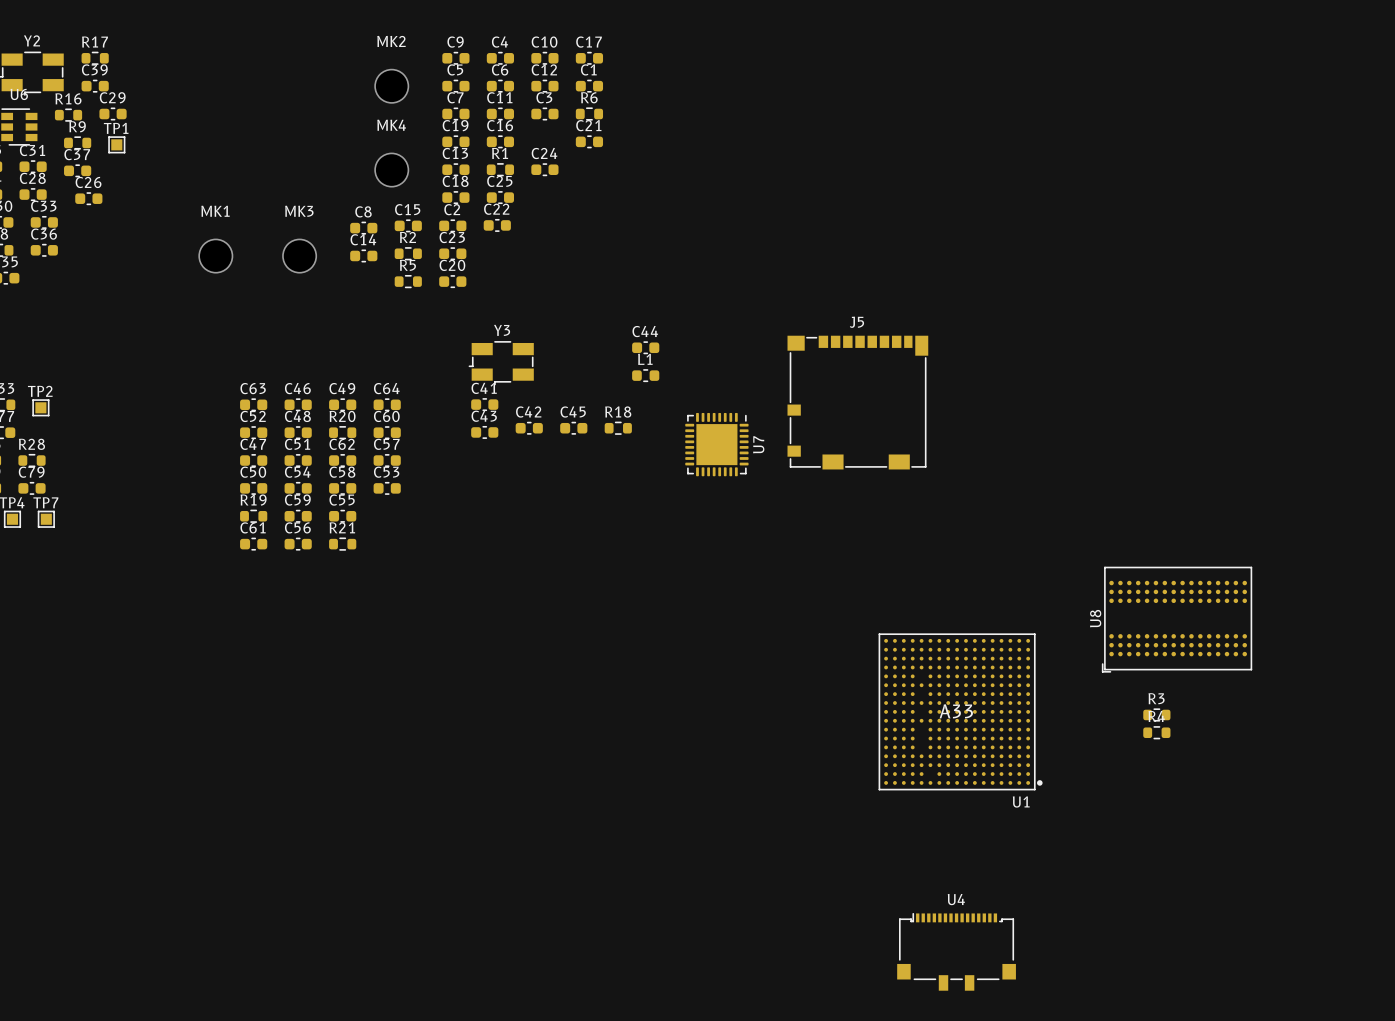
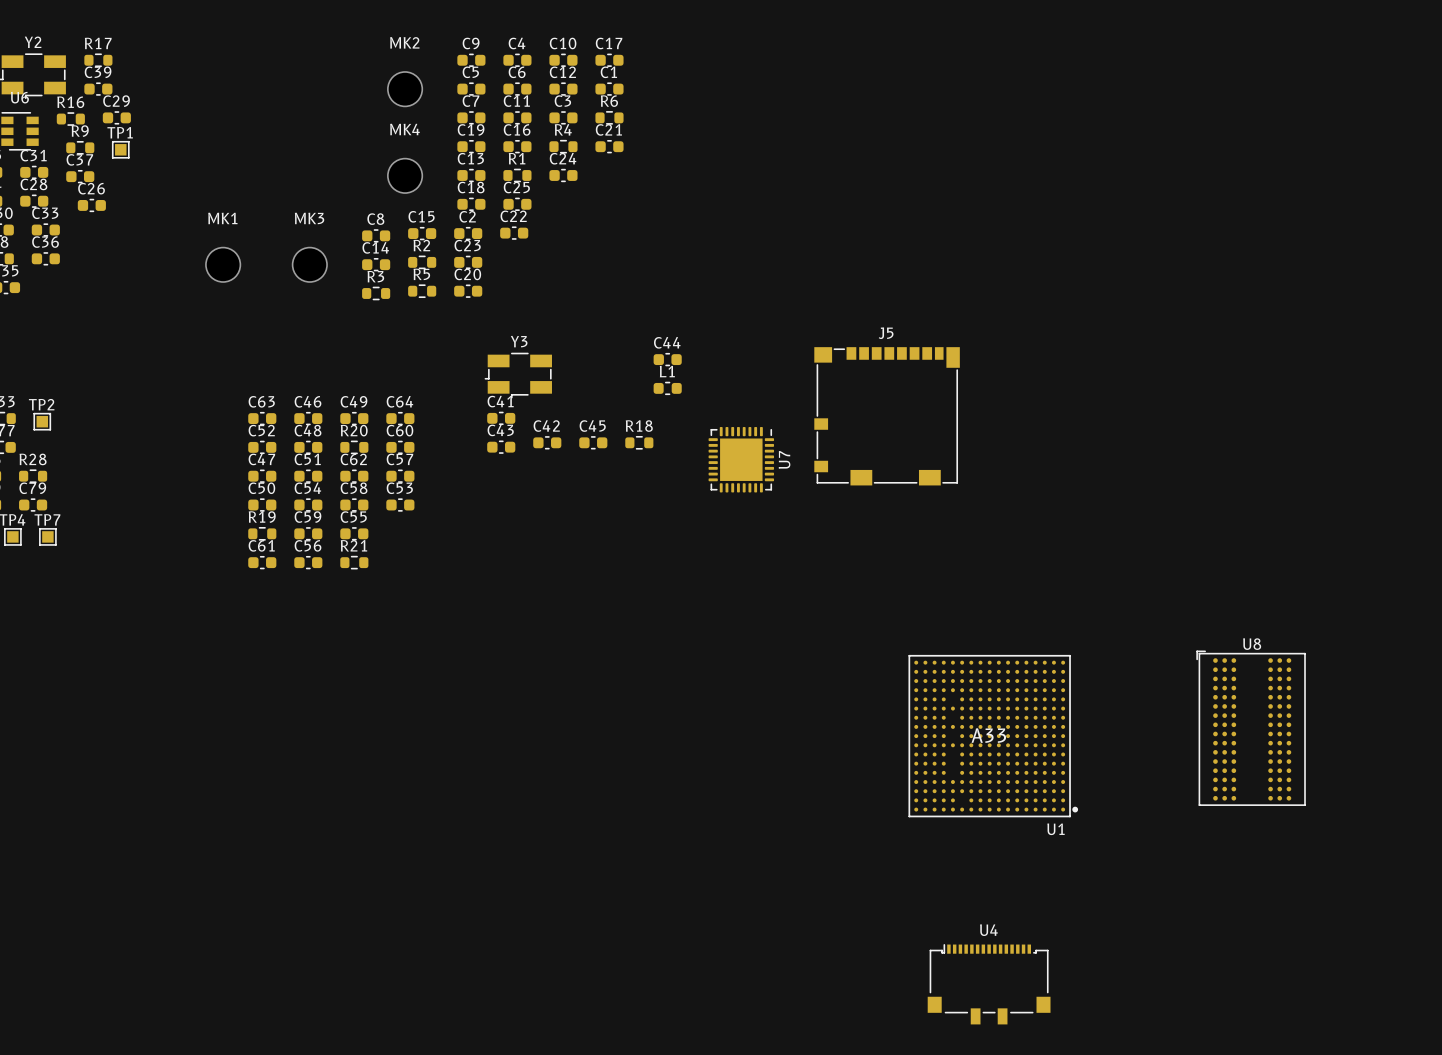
U8 rotation: 0° (1177, 619) -> 90° clockwise (1251, 728)
U8 position: (1177, 619) -> (1251, 728)
R3 position: (1156, 714) -> (376, 293)
R4 position: (1156, 732) -> (563, 146)

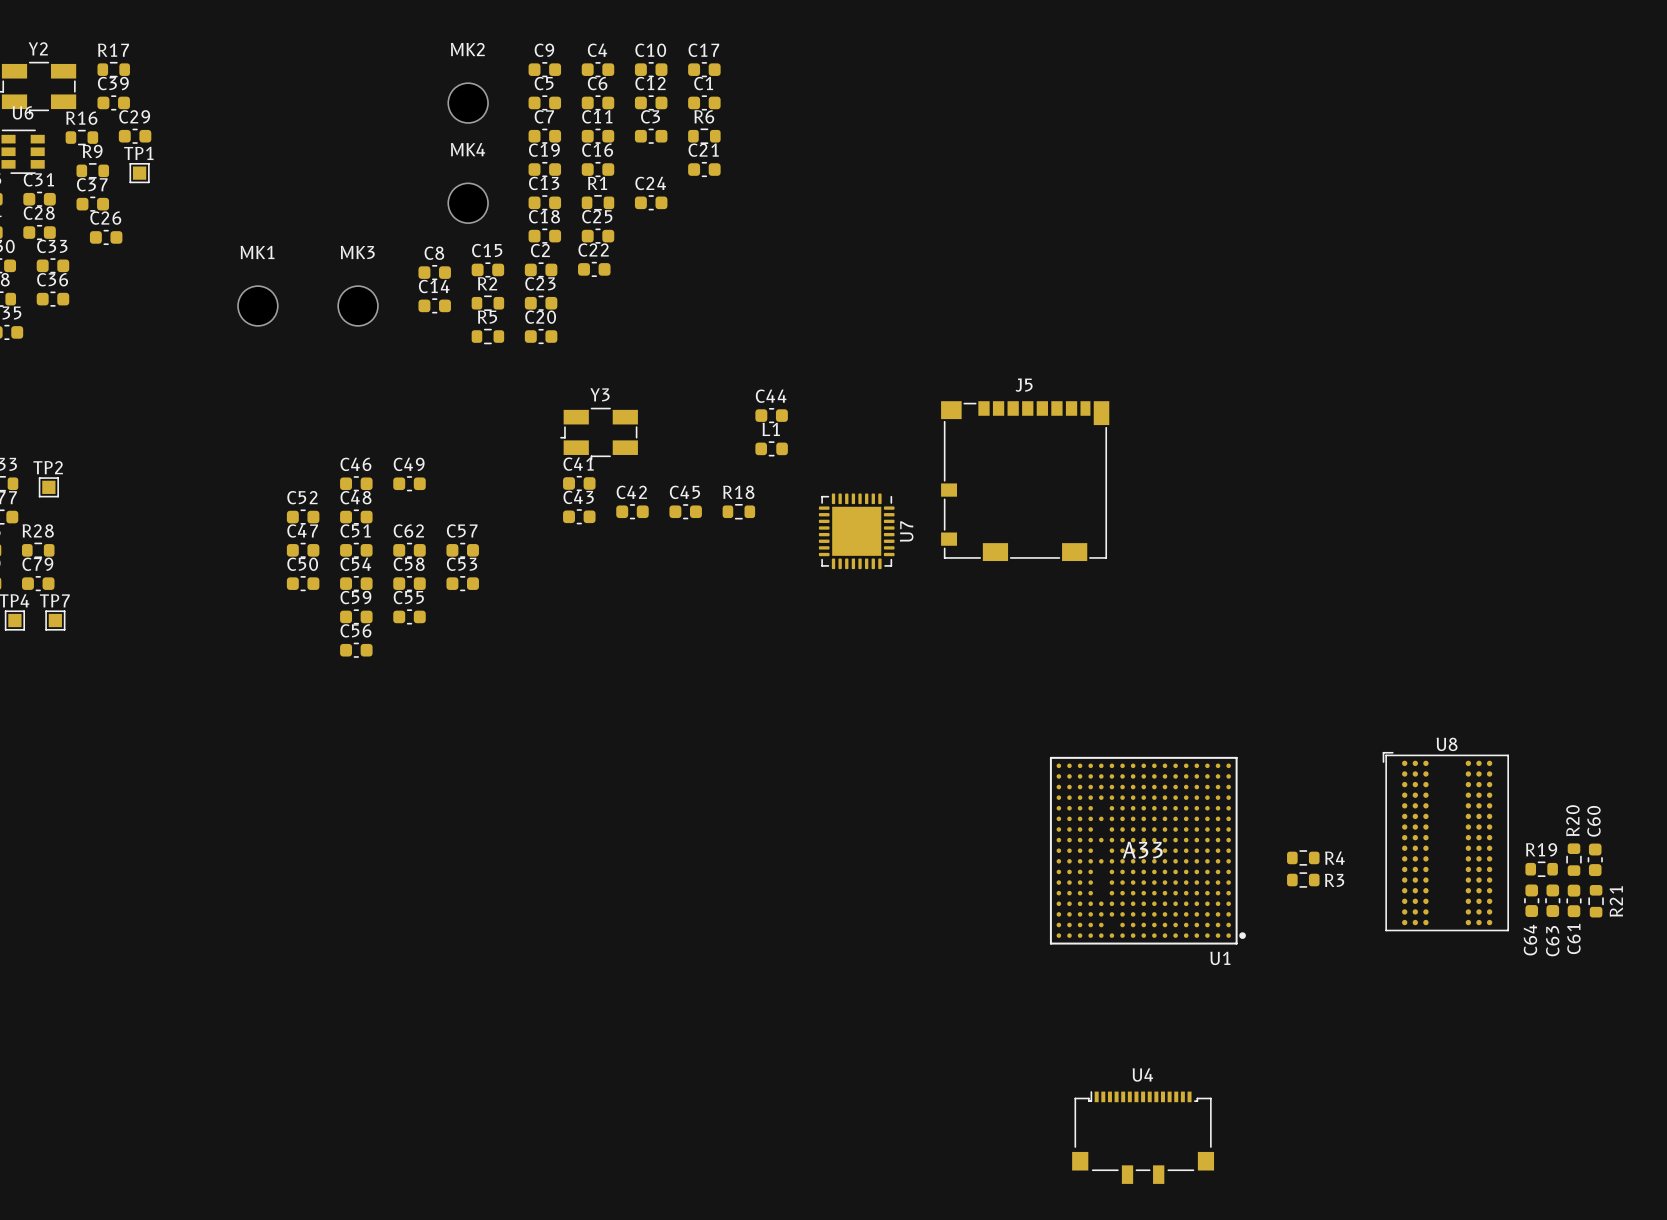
R4 name position: R4 (563, 129) -> R4 (1334, 858)
R4 position: (563, 146) -> (1303, 857)
R3 name position: R3 (375, 276) -> R3 (1334, 880)
R3 position: (376, 293) -> (1303, 880)
C63 name position: C63 (261, 401) -> C63 (1552, 941)
C64 name position: C64 (399, 401) -> C64 (1530, 940)
C63 rotation: 0° (262, 418) -> 90° clockwise (1552, 900)
C63 position: (262, 418) -> (1552, 900)
C64 rotation: 0° (400, 418) -> 90° clockwise (1531, 900)
C64 position: (400, 418) -> (1531, 900)
R20 rotation: 0° (354, 447) -> 90° clockwise (1574, 859)
R20 position: (354, 447) -> (1574, 859)
C60 rotation: 0° (400, 447) -> 90° clockwise (1595, 859)
C60 position: (400, 447) -> (1595, 859)
R19 position: (262, 533) -> (1541, 869)
C61 name position: C61 (261, 545) -> C61 (1573, 939)
C61 rotation: 0° (262, 562) -> 90° clockwise (1574, 900)
C61 position: (262, 562) -> (1574, 900)
R21 rotation: 0° (354, 562) -> 90° clockwise (1596, 901)
R21 position: (354, 562) -> (1596, 901)

